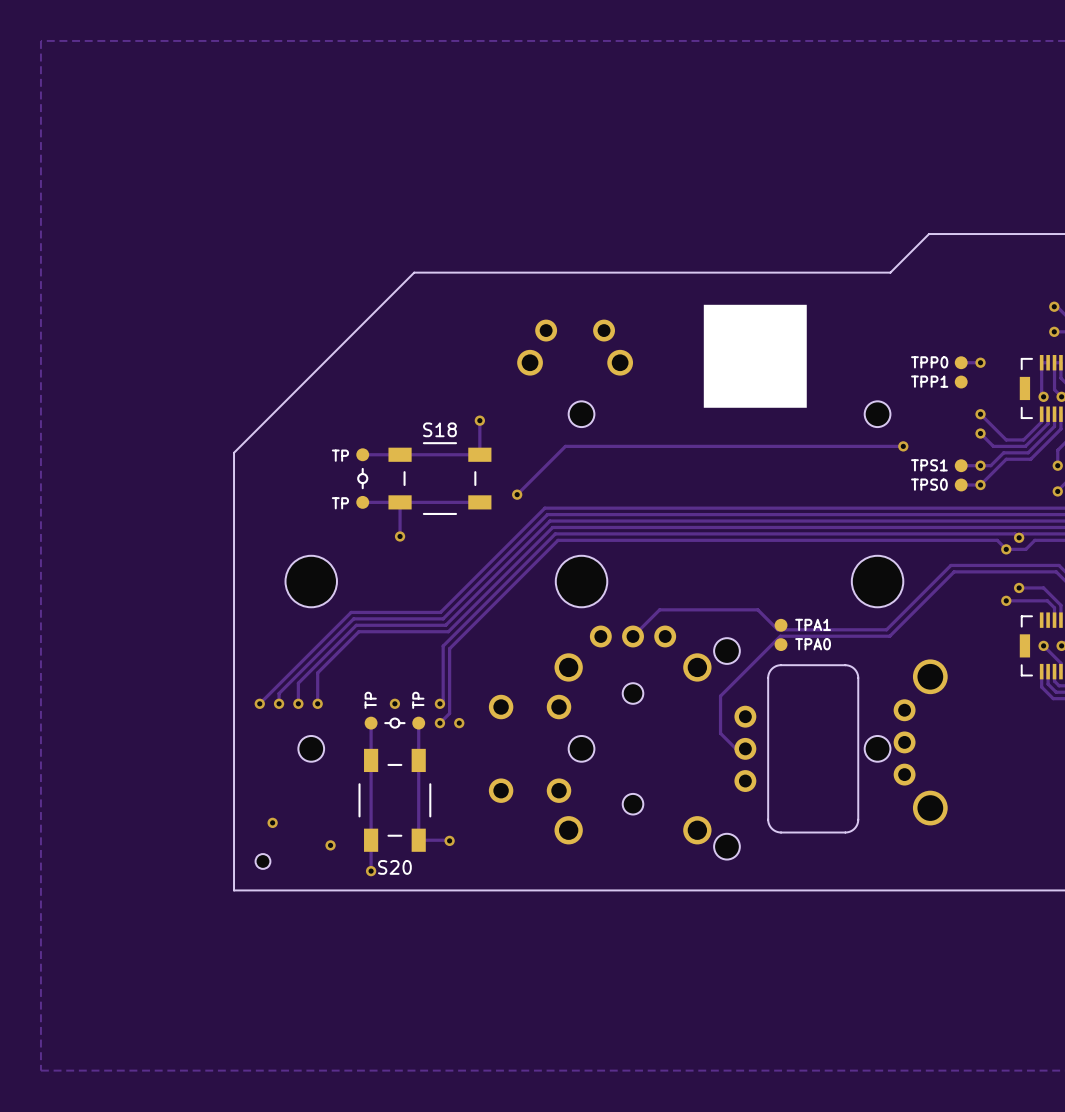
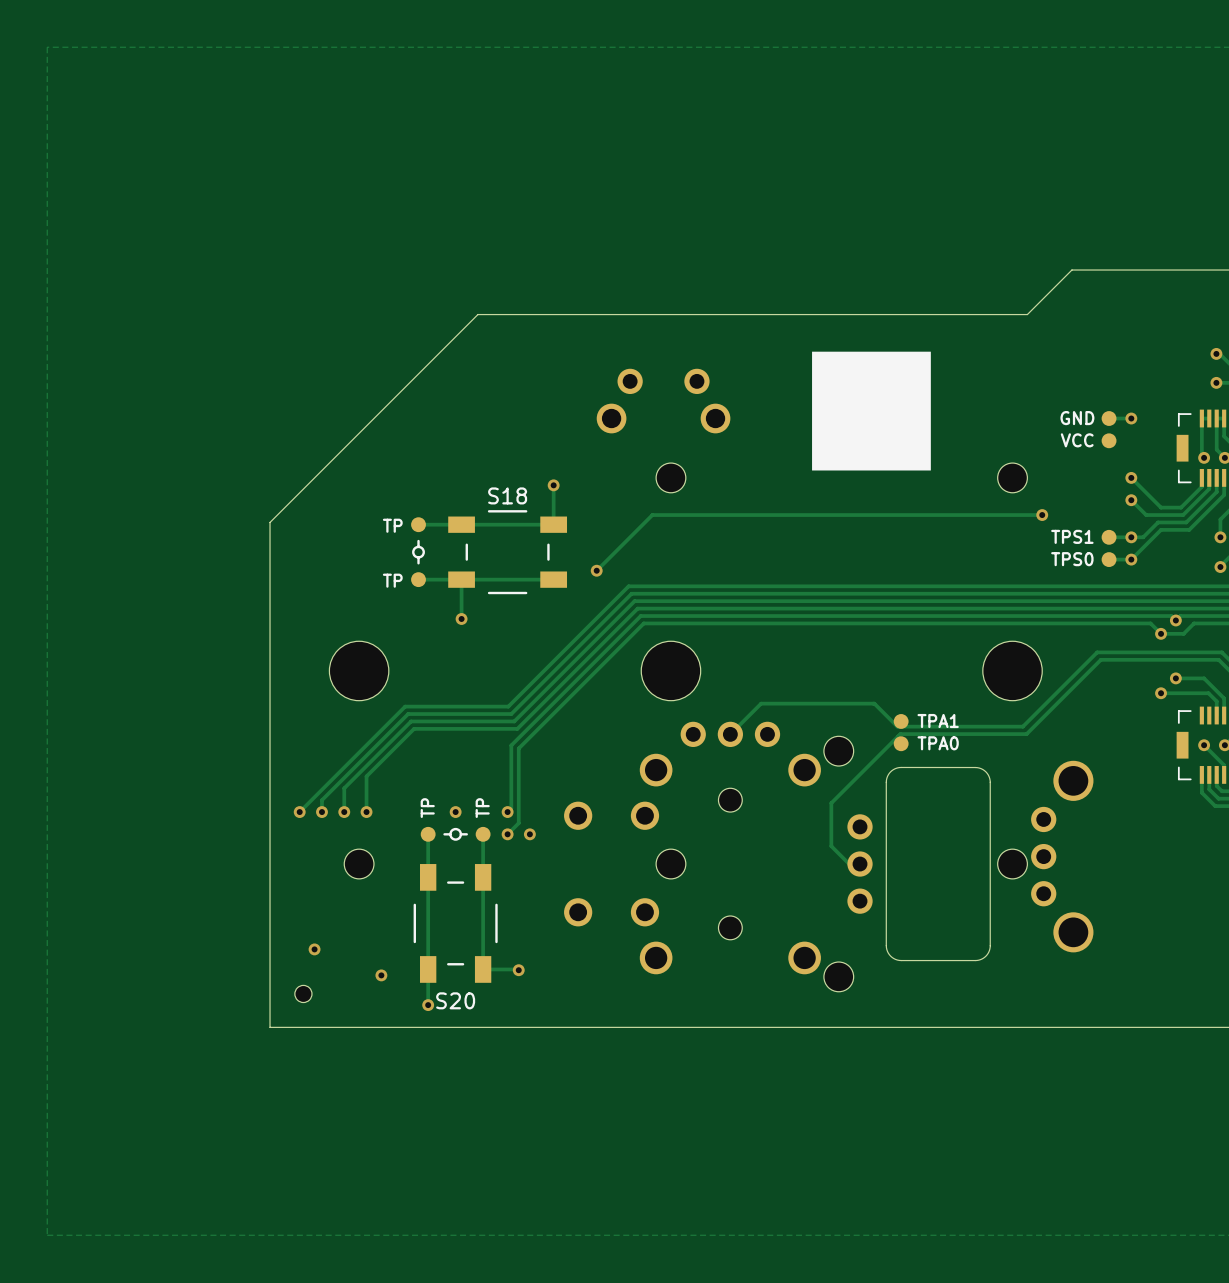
TPP0 name: TPP0 (929, 362) -> none
text: none -> GND (1077, 418)
TPP1 name: TPP1 (929, 381) -> none
text: none -> VCC (1077, 440)

